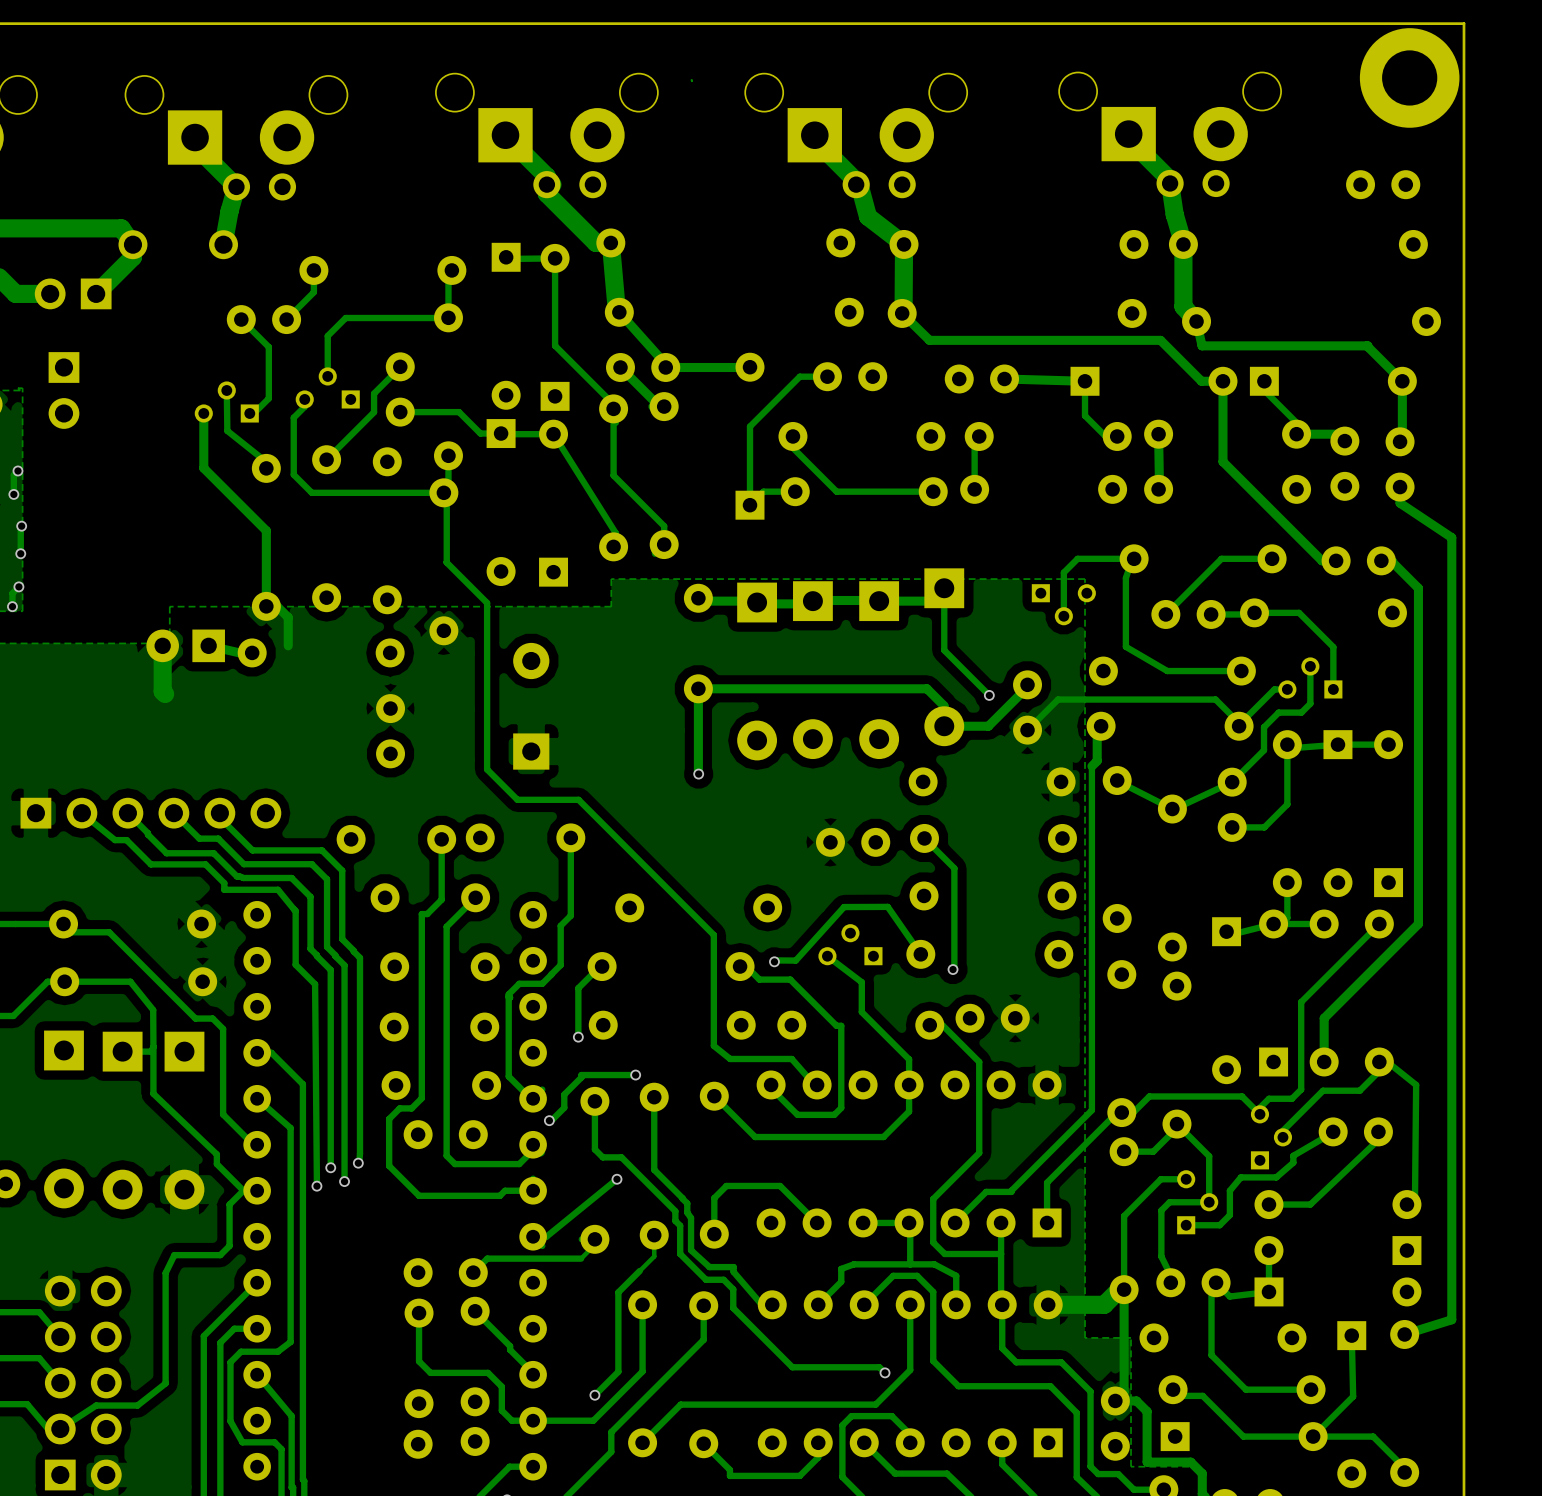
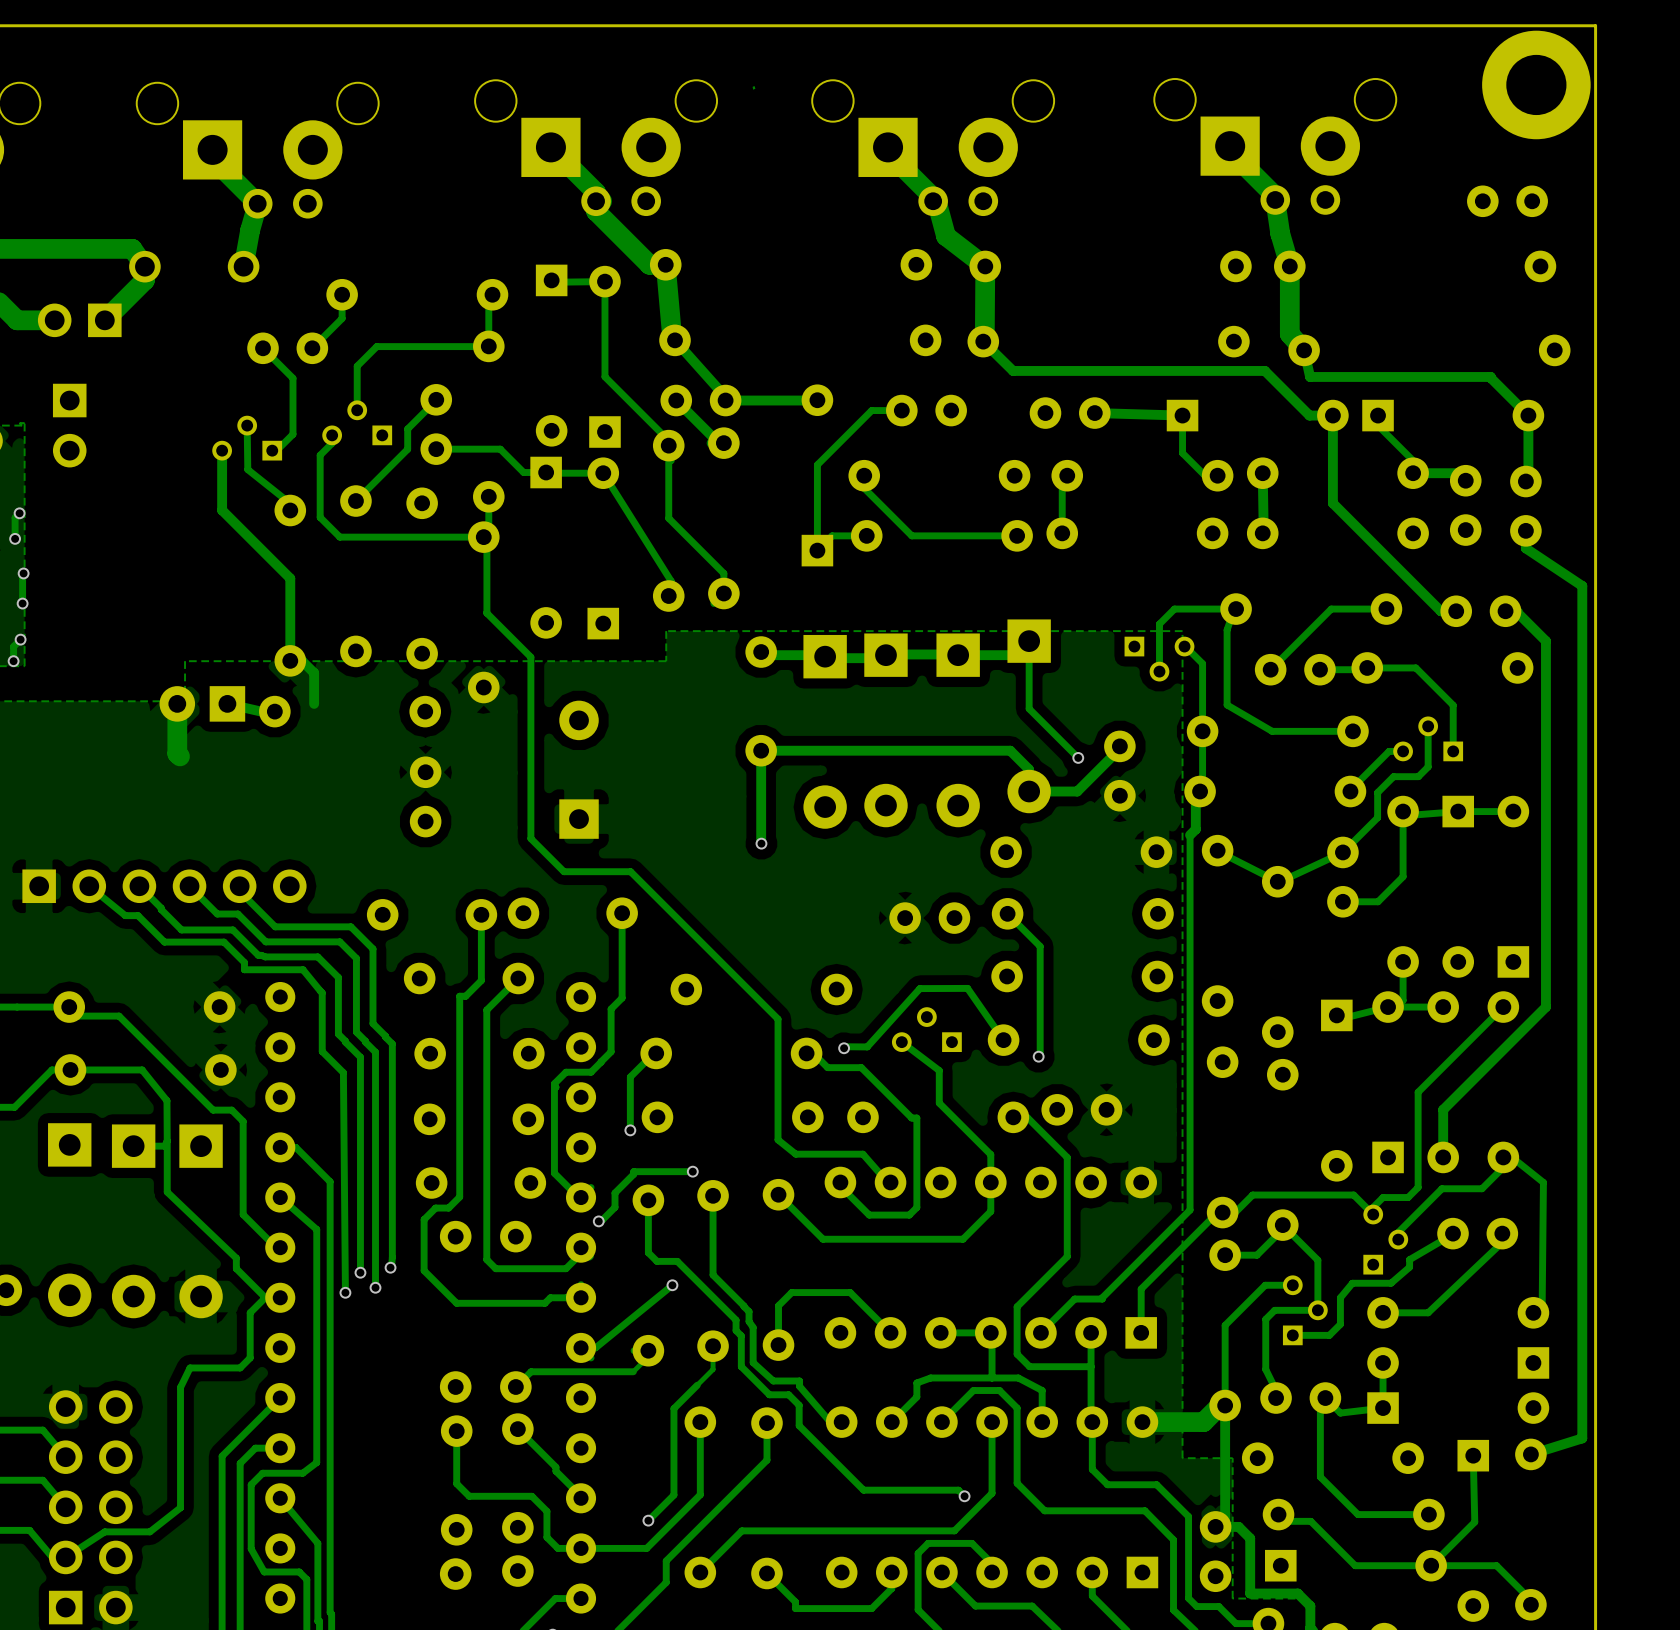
track: none -> (1184, 646) (1202, 663) (1202, 789)
track: (1239, 724) (1215, 699) (1058, 699) (1027, 730) -> none

